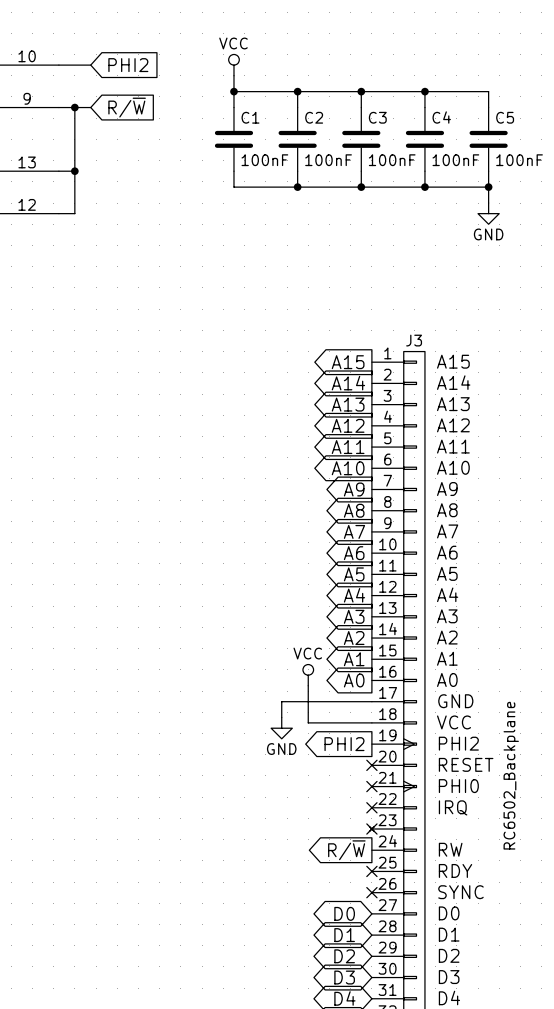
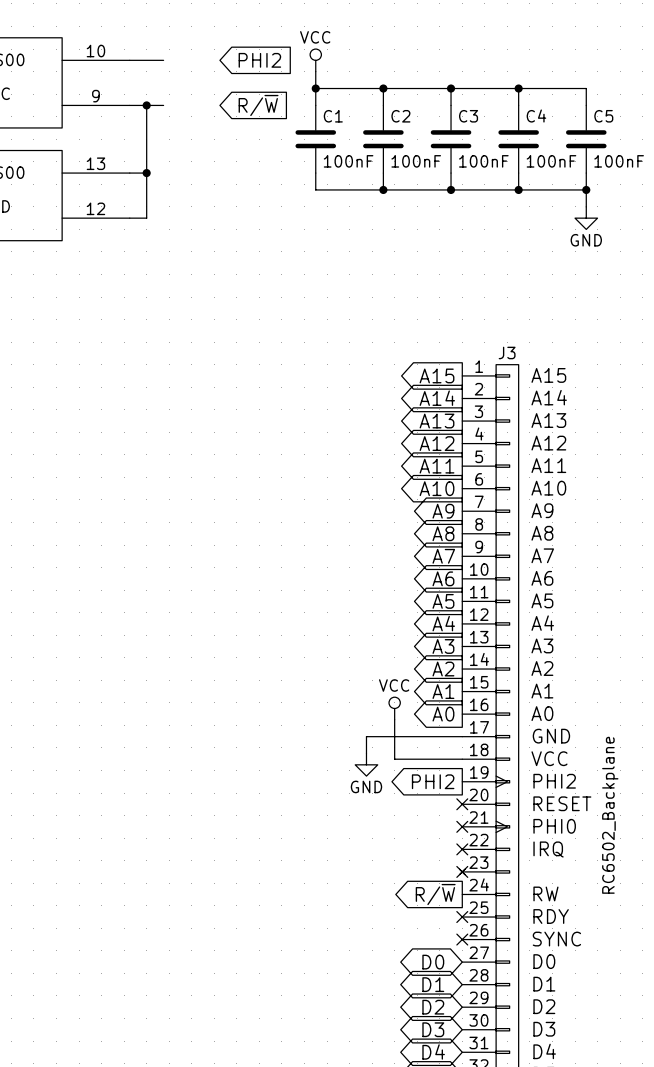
global label position: PHI2 (128, 65) -> PHI2 (259, 60)
global label position: R/~{W} (127, 107) -> R/~{W} (258, 105)

